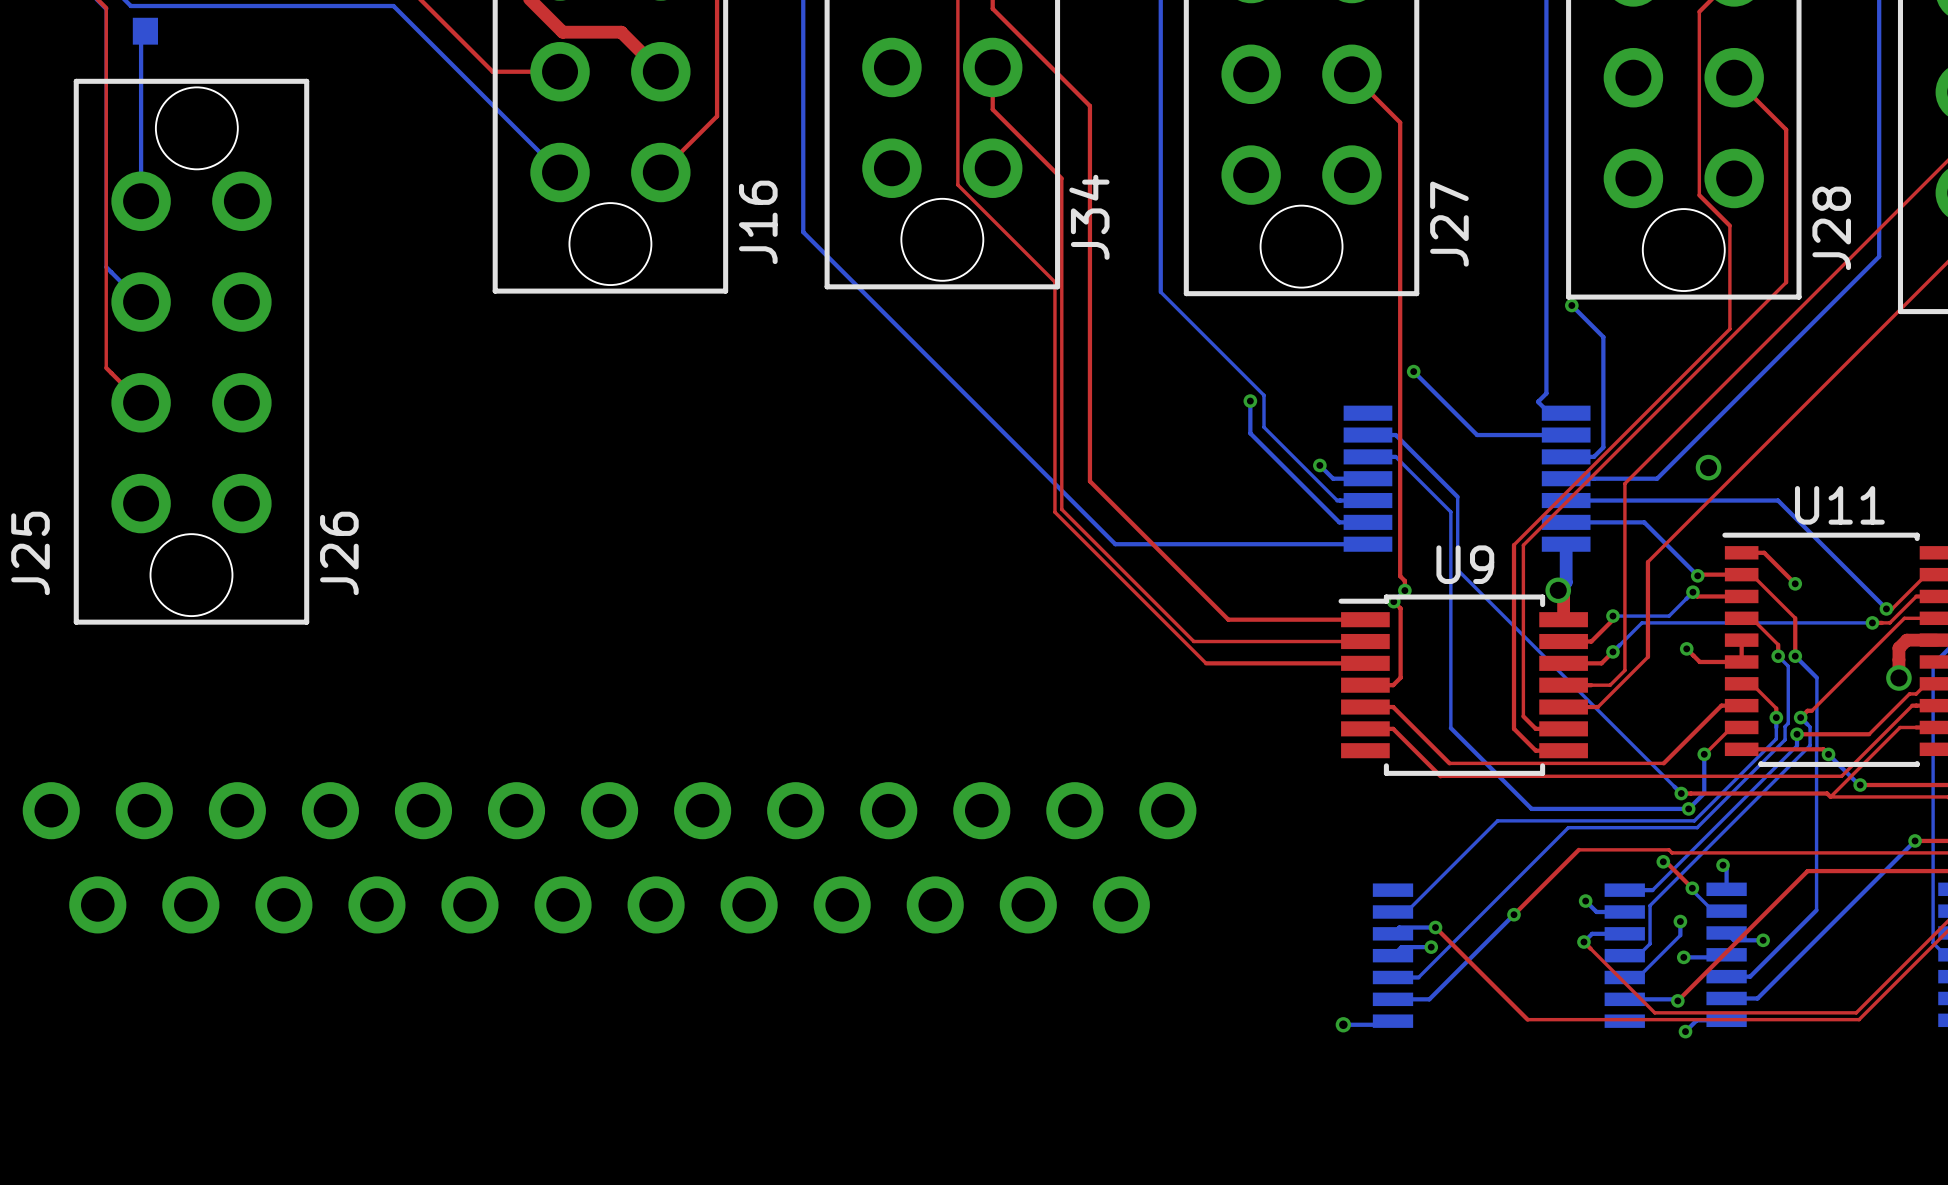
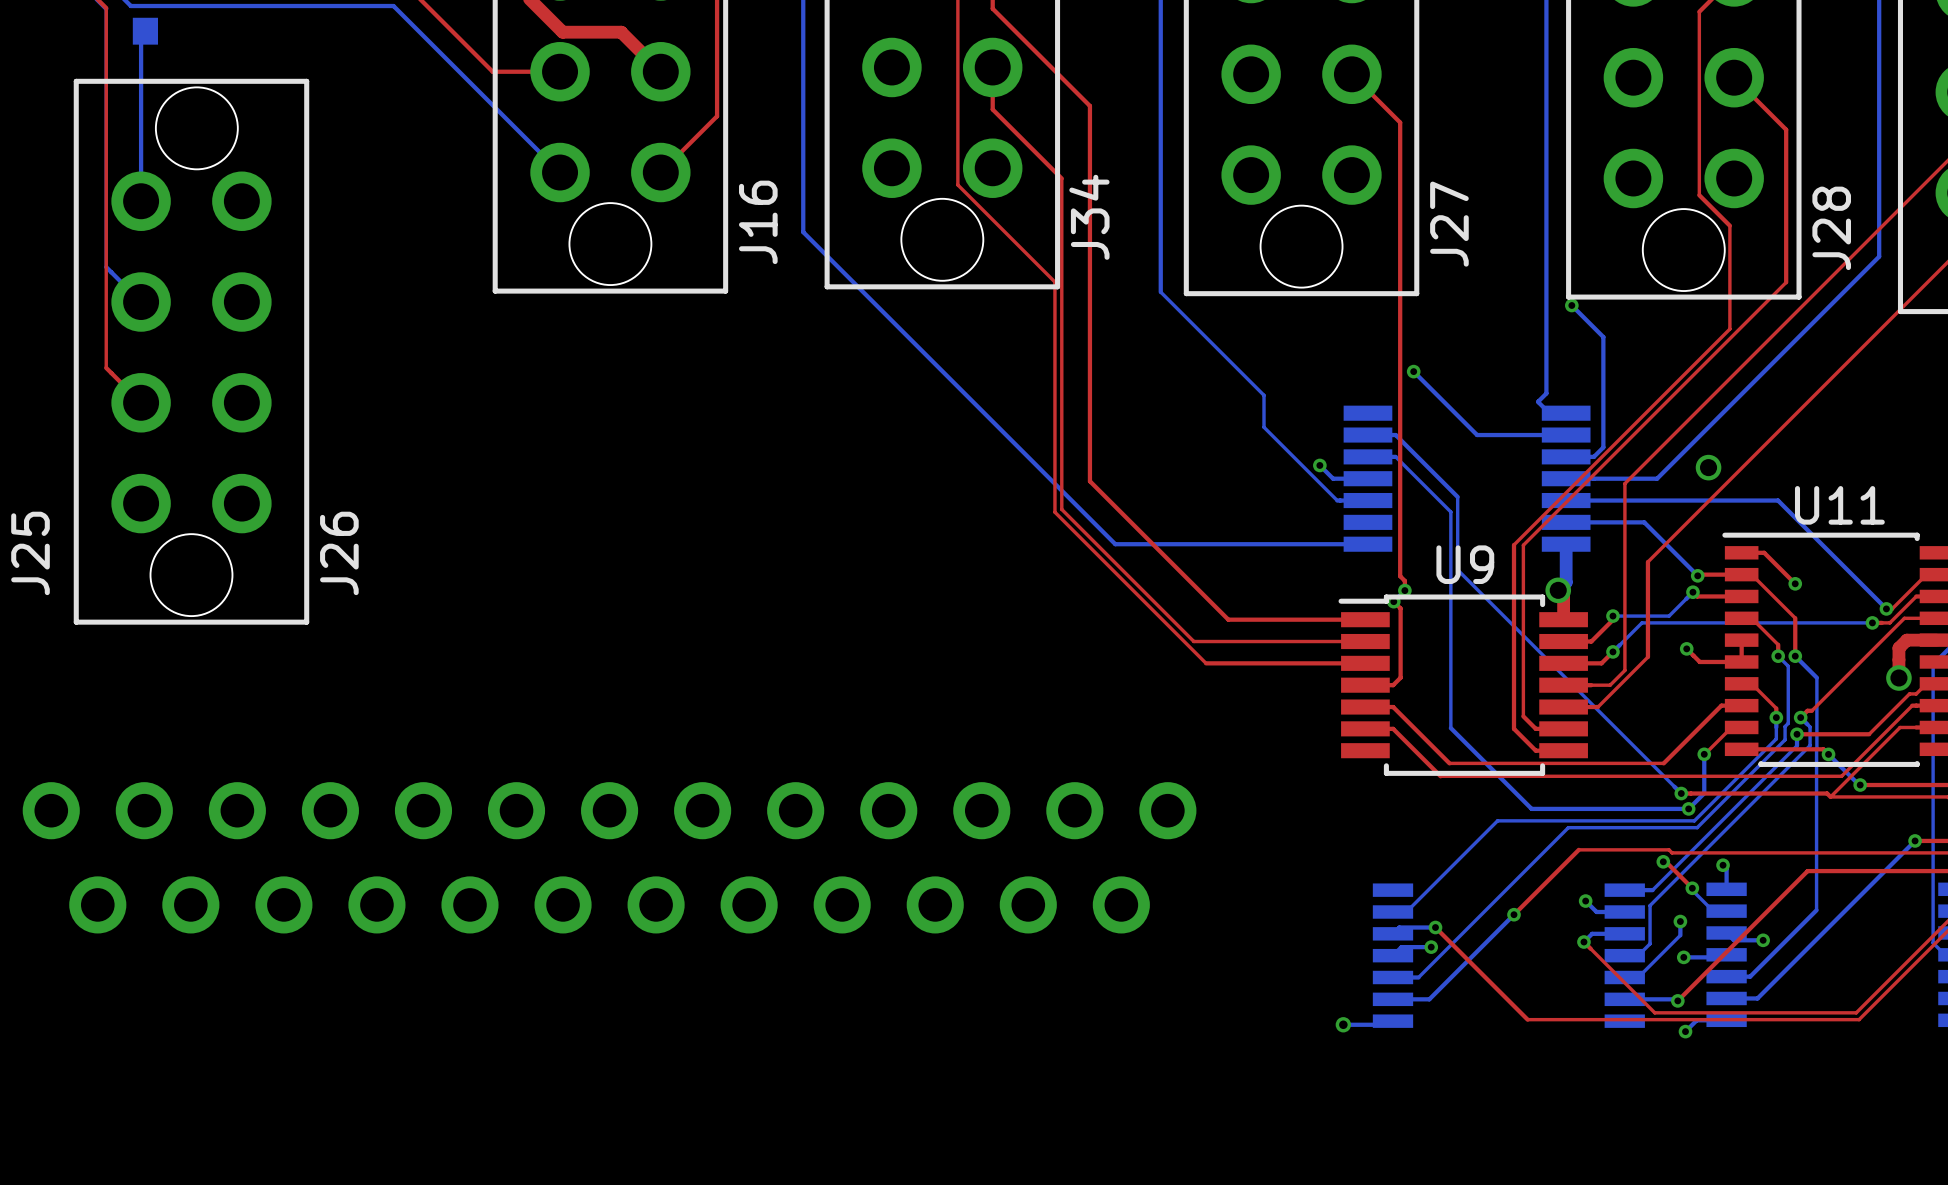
bottom track: (1250, 401) (1250, 433) (1339, 522) (1367, 522) -> none
via: (1250, 401) -> none

